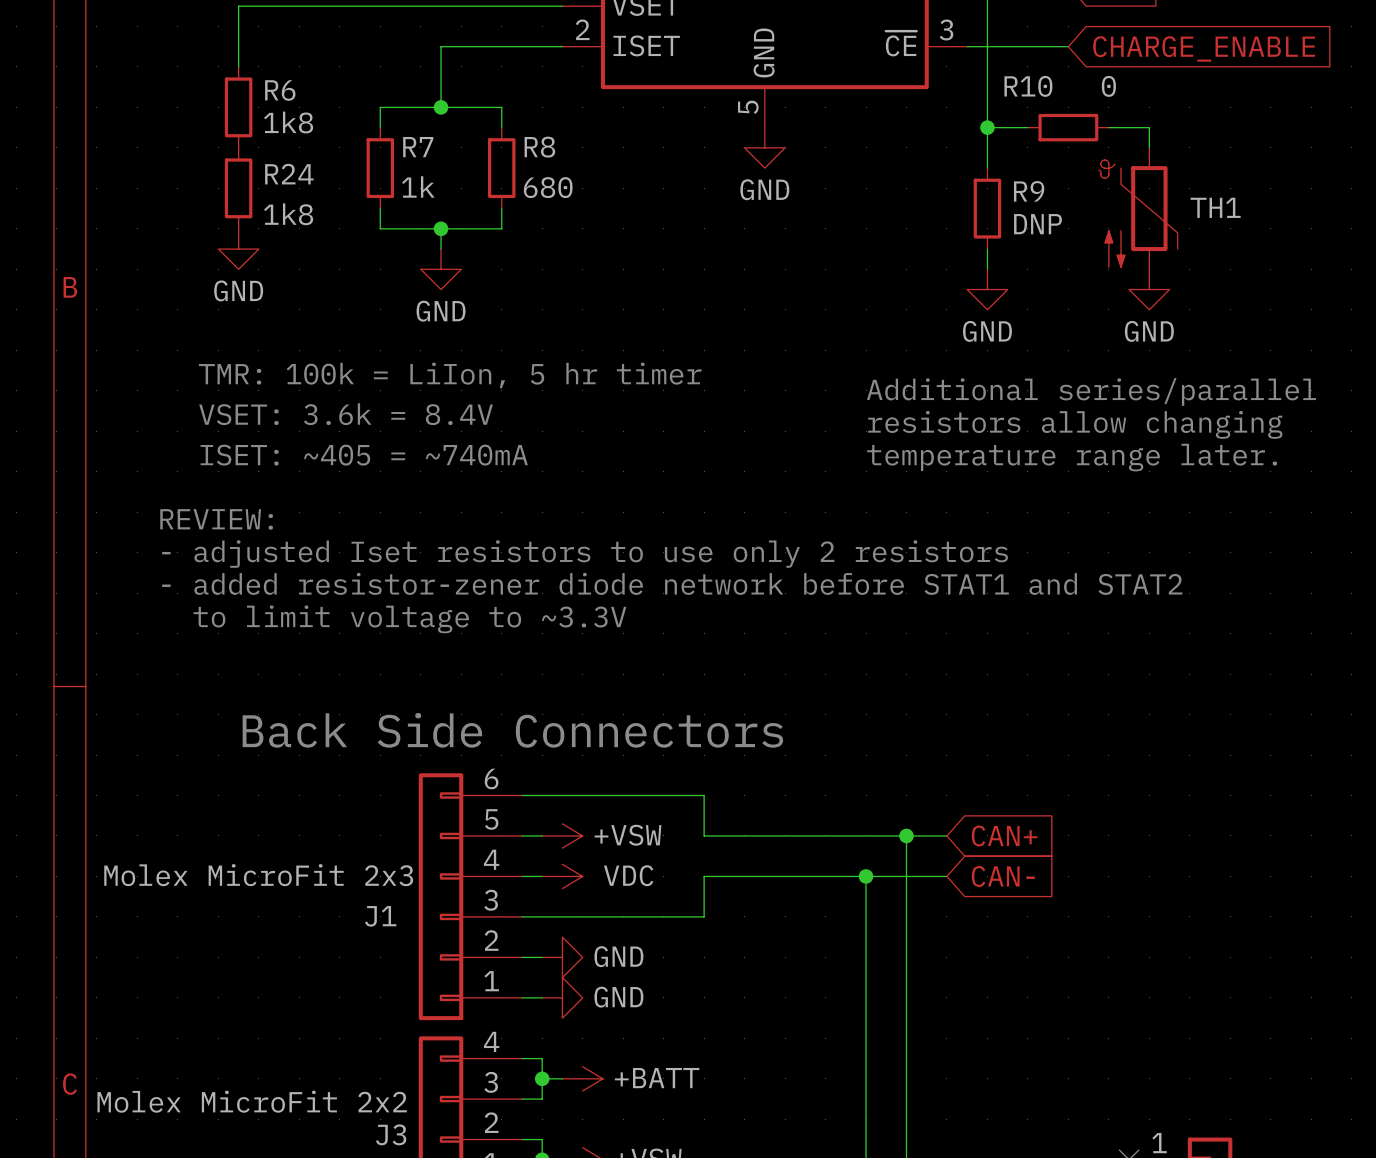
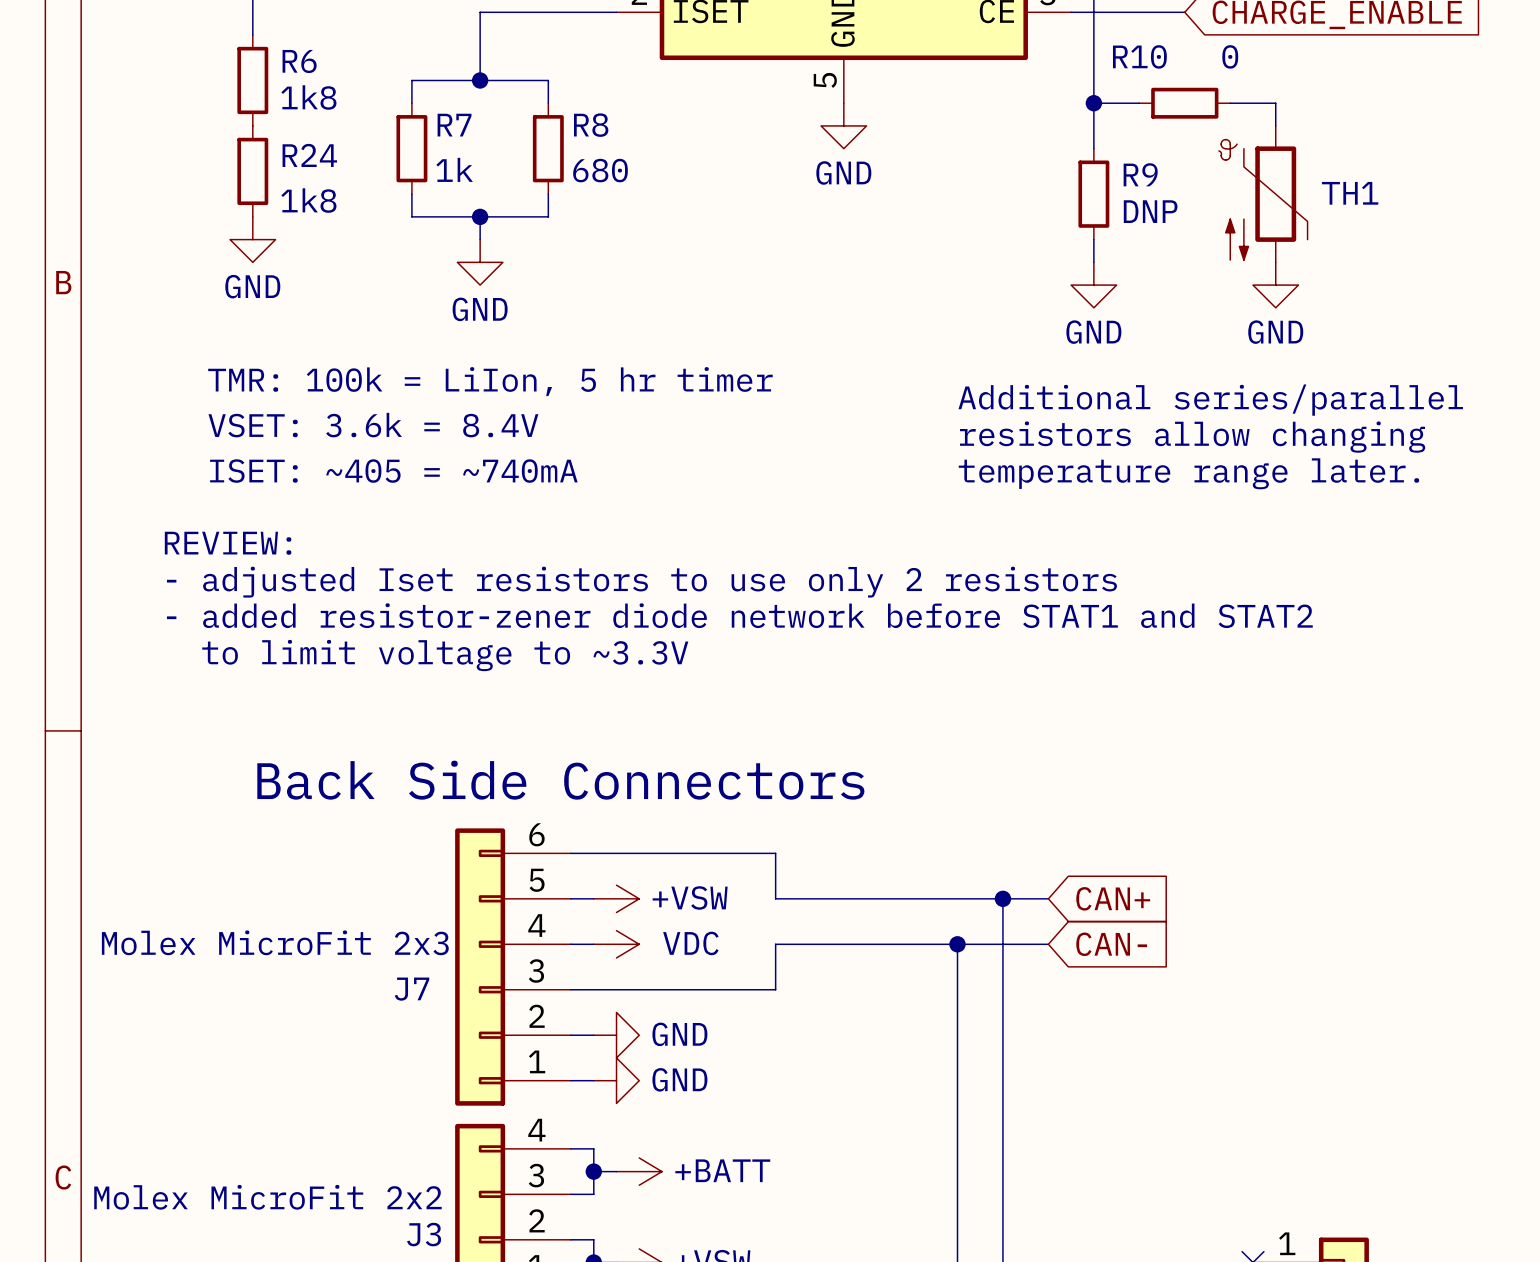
J1 name: J1 (380, 916) -> J7 (412, 989)

